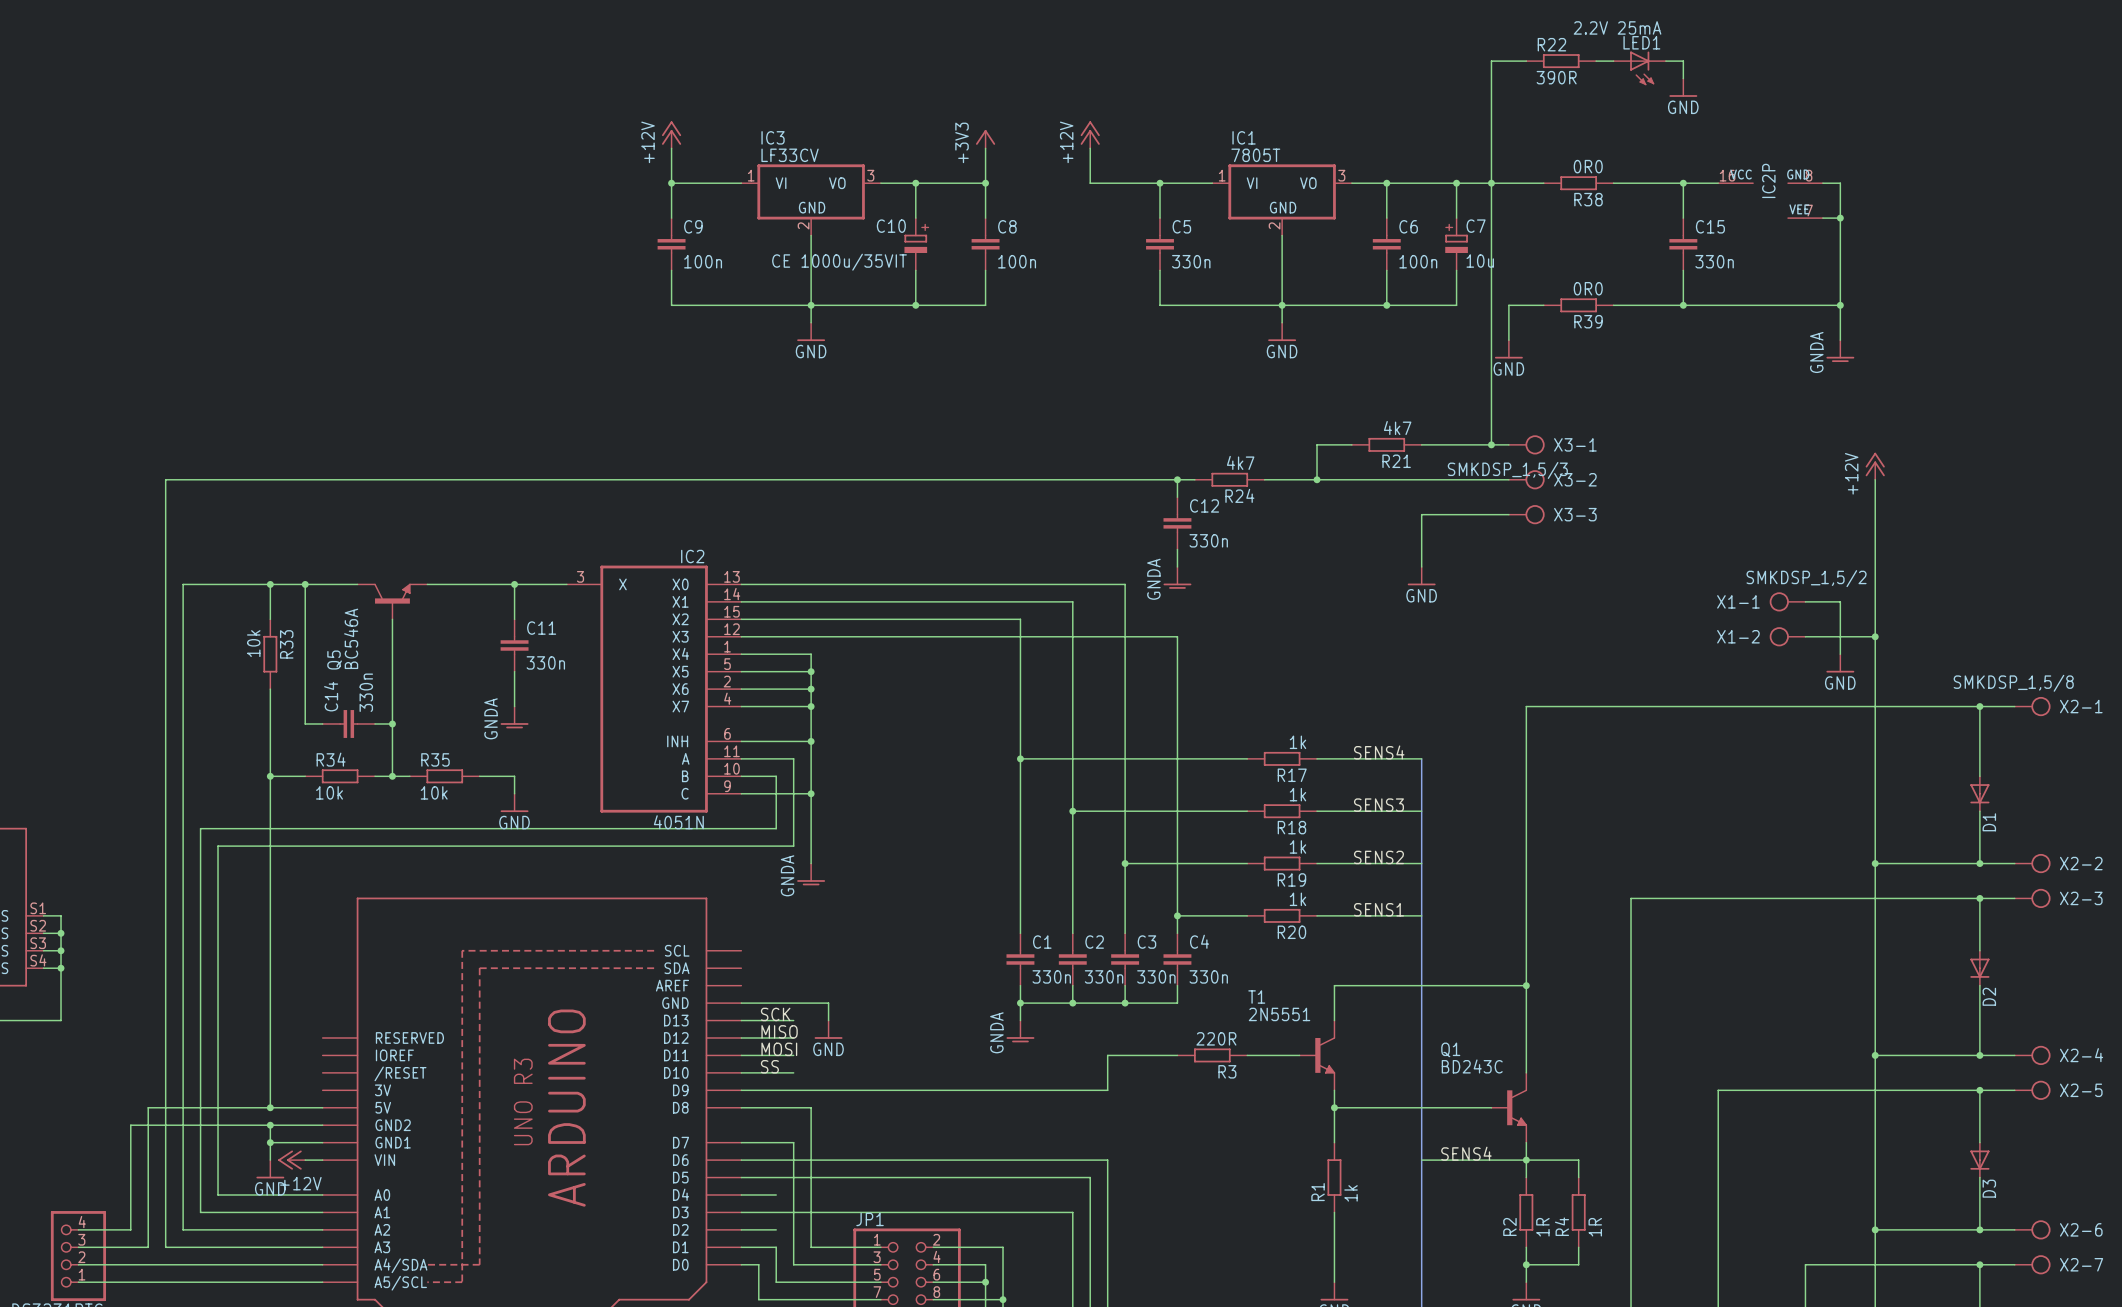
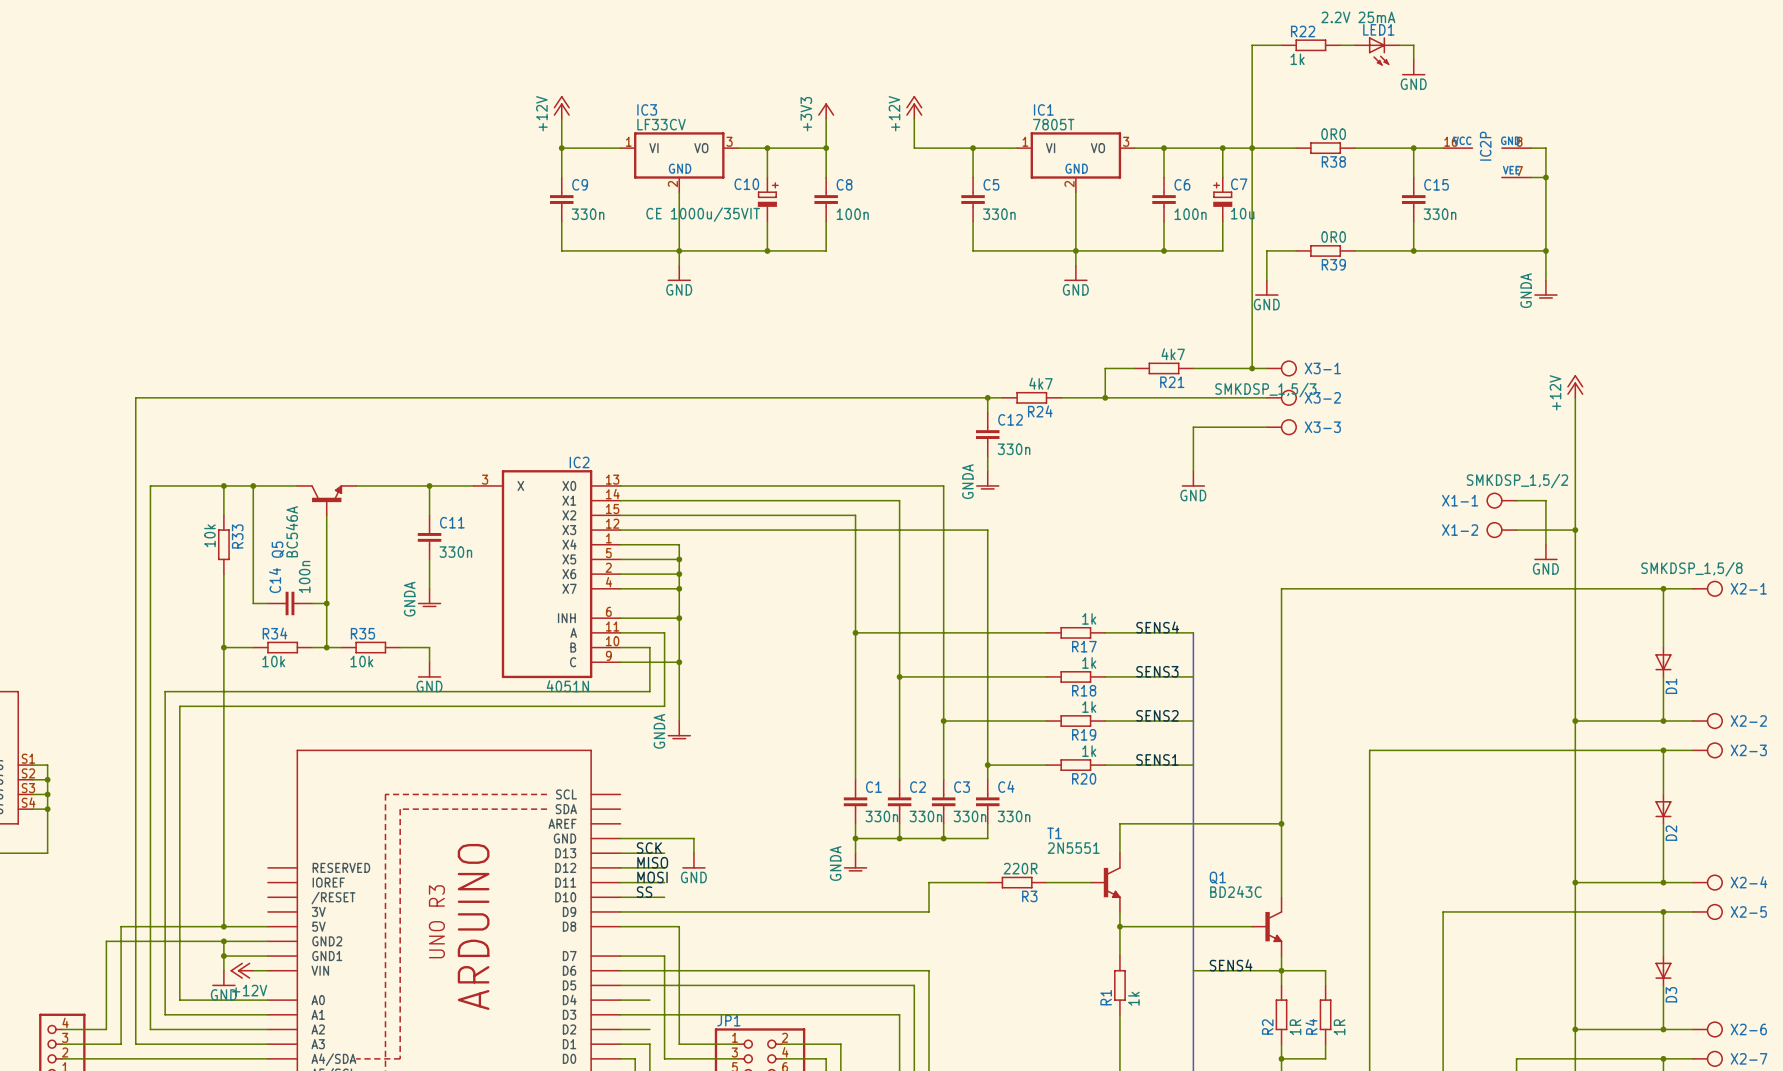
R22 value: 390R (1556, 77) -> 1k (1297, 59)
C9 value: 100n (703, 261) -> 330n (588, 214)
C14 value: 330n (366, 692) -> 100n (304, 576)

